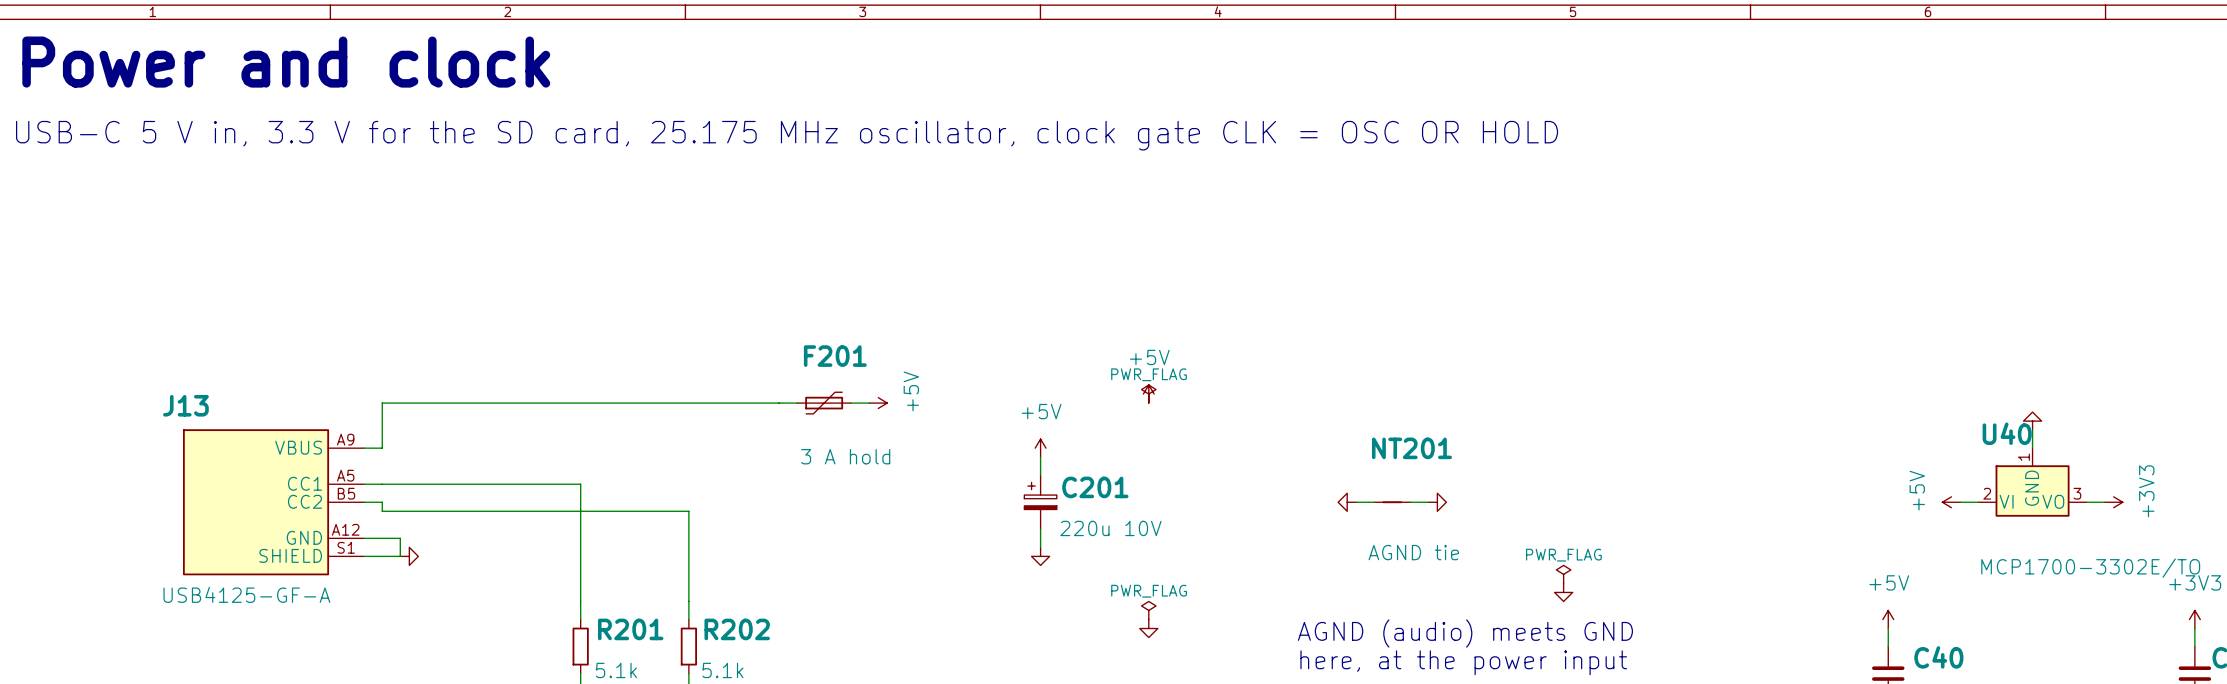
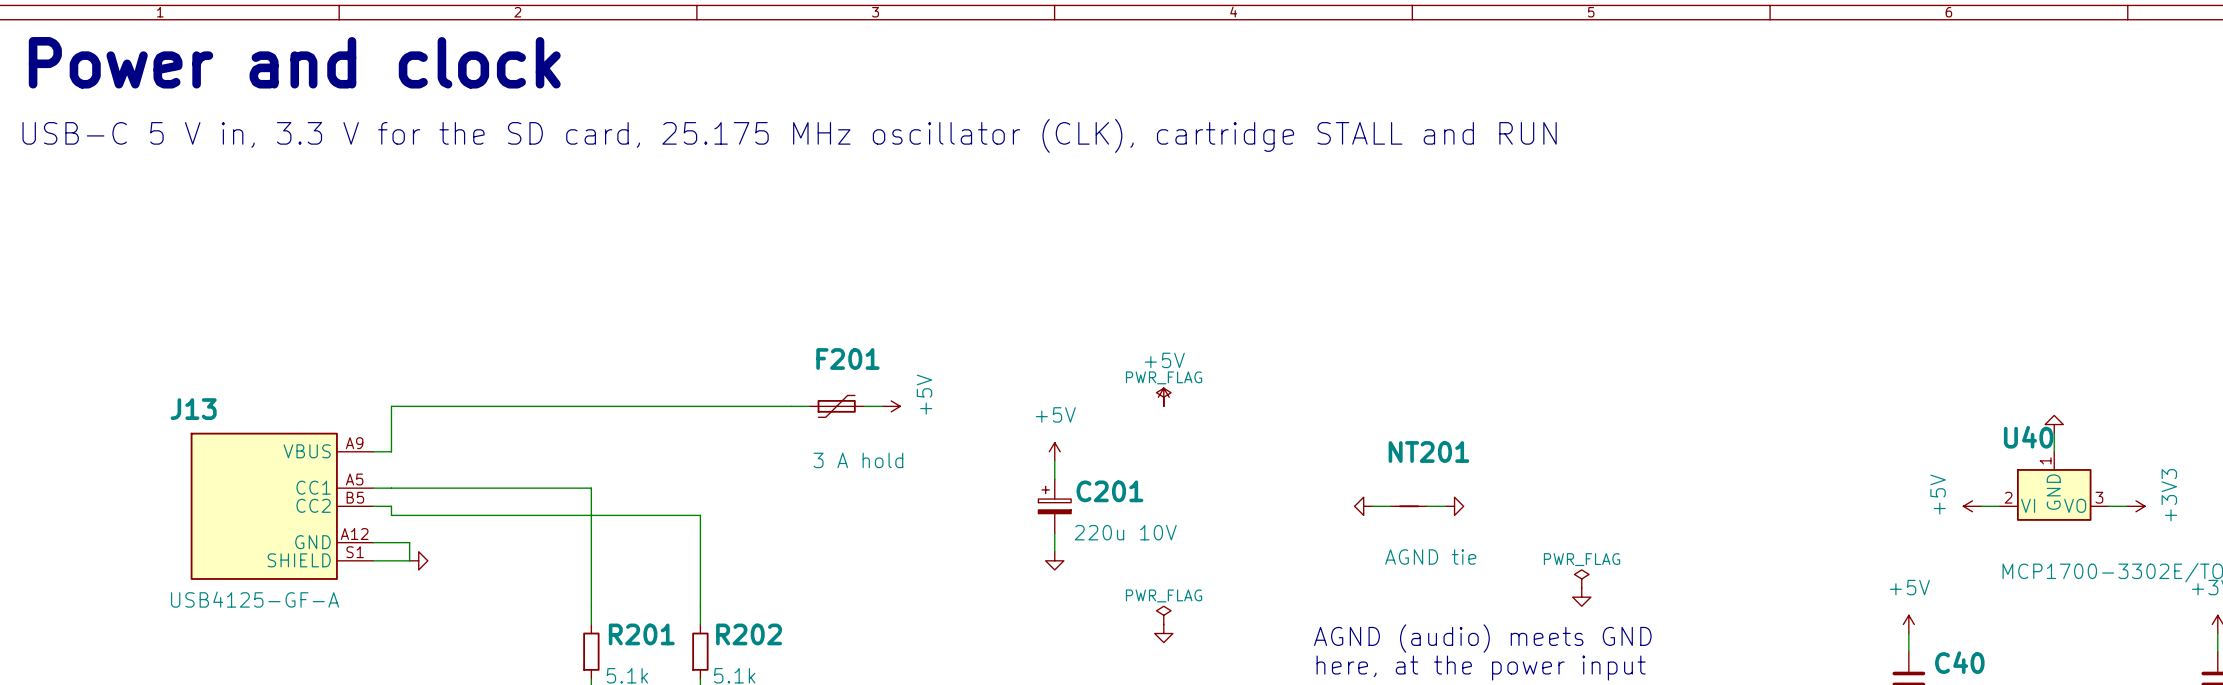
text: USB-C 5 V in, 3.3 V for the SD card, 25.175 MHz oscillator, clock gate CLK = OSC OR HOLD (787, 135) -> USB-C 5 V in, 3.3 V for the SD card, 25.175 MHz oscillator (CLK), cartridge STALL and RUN (789, 135)

